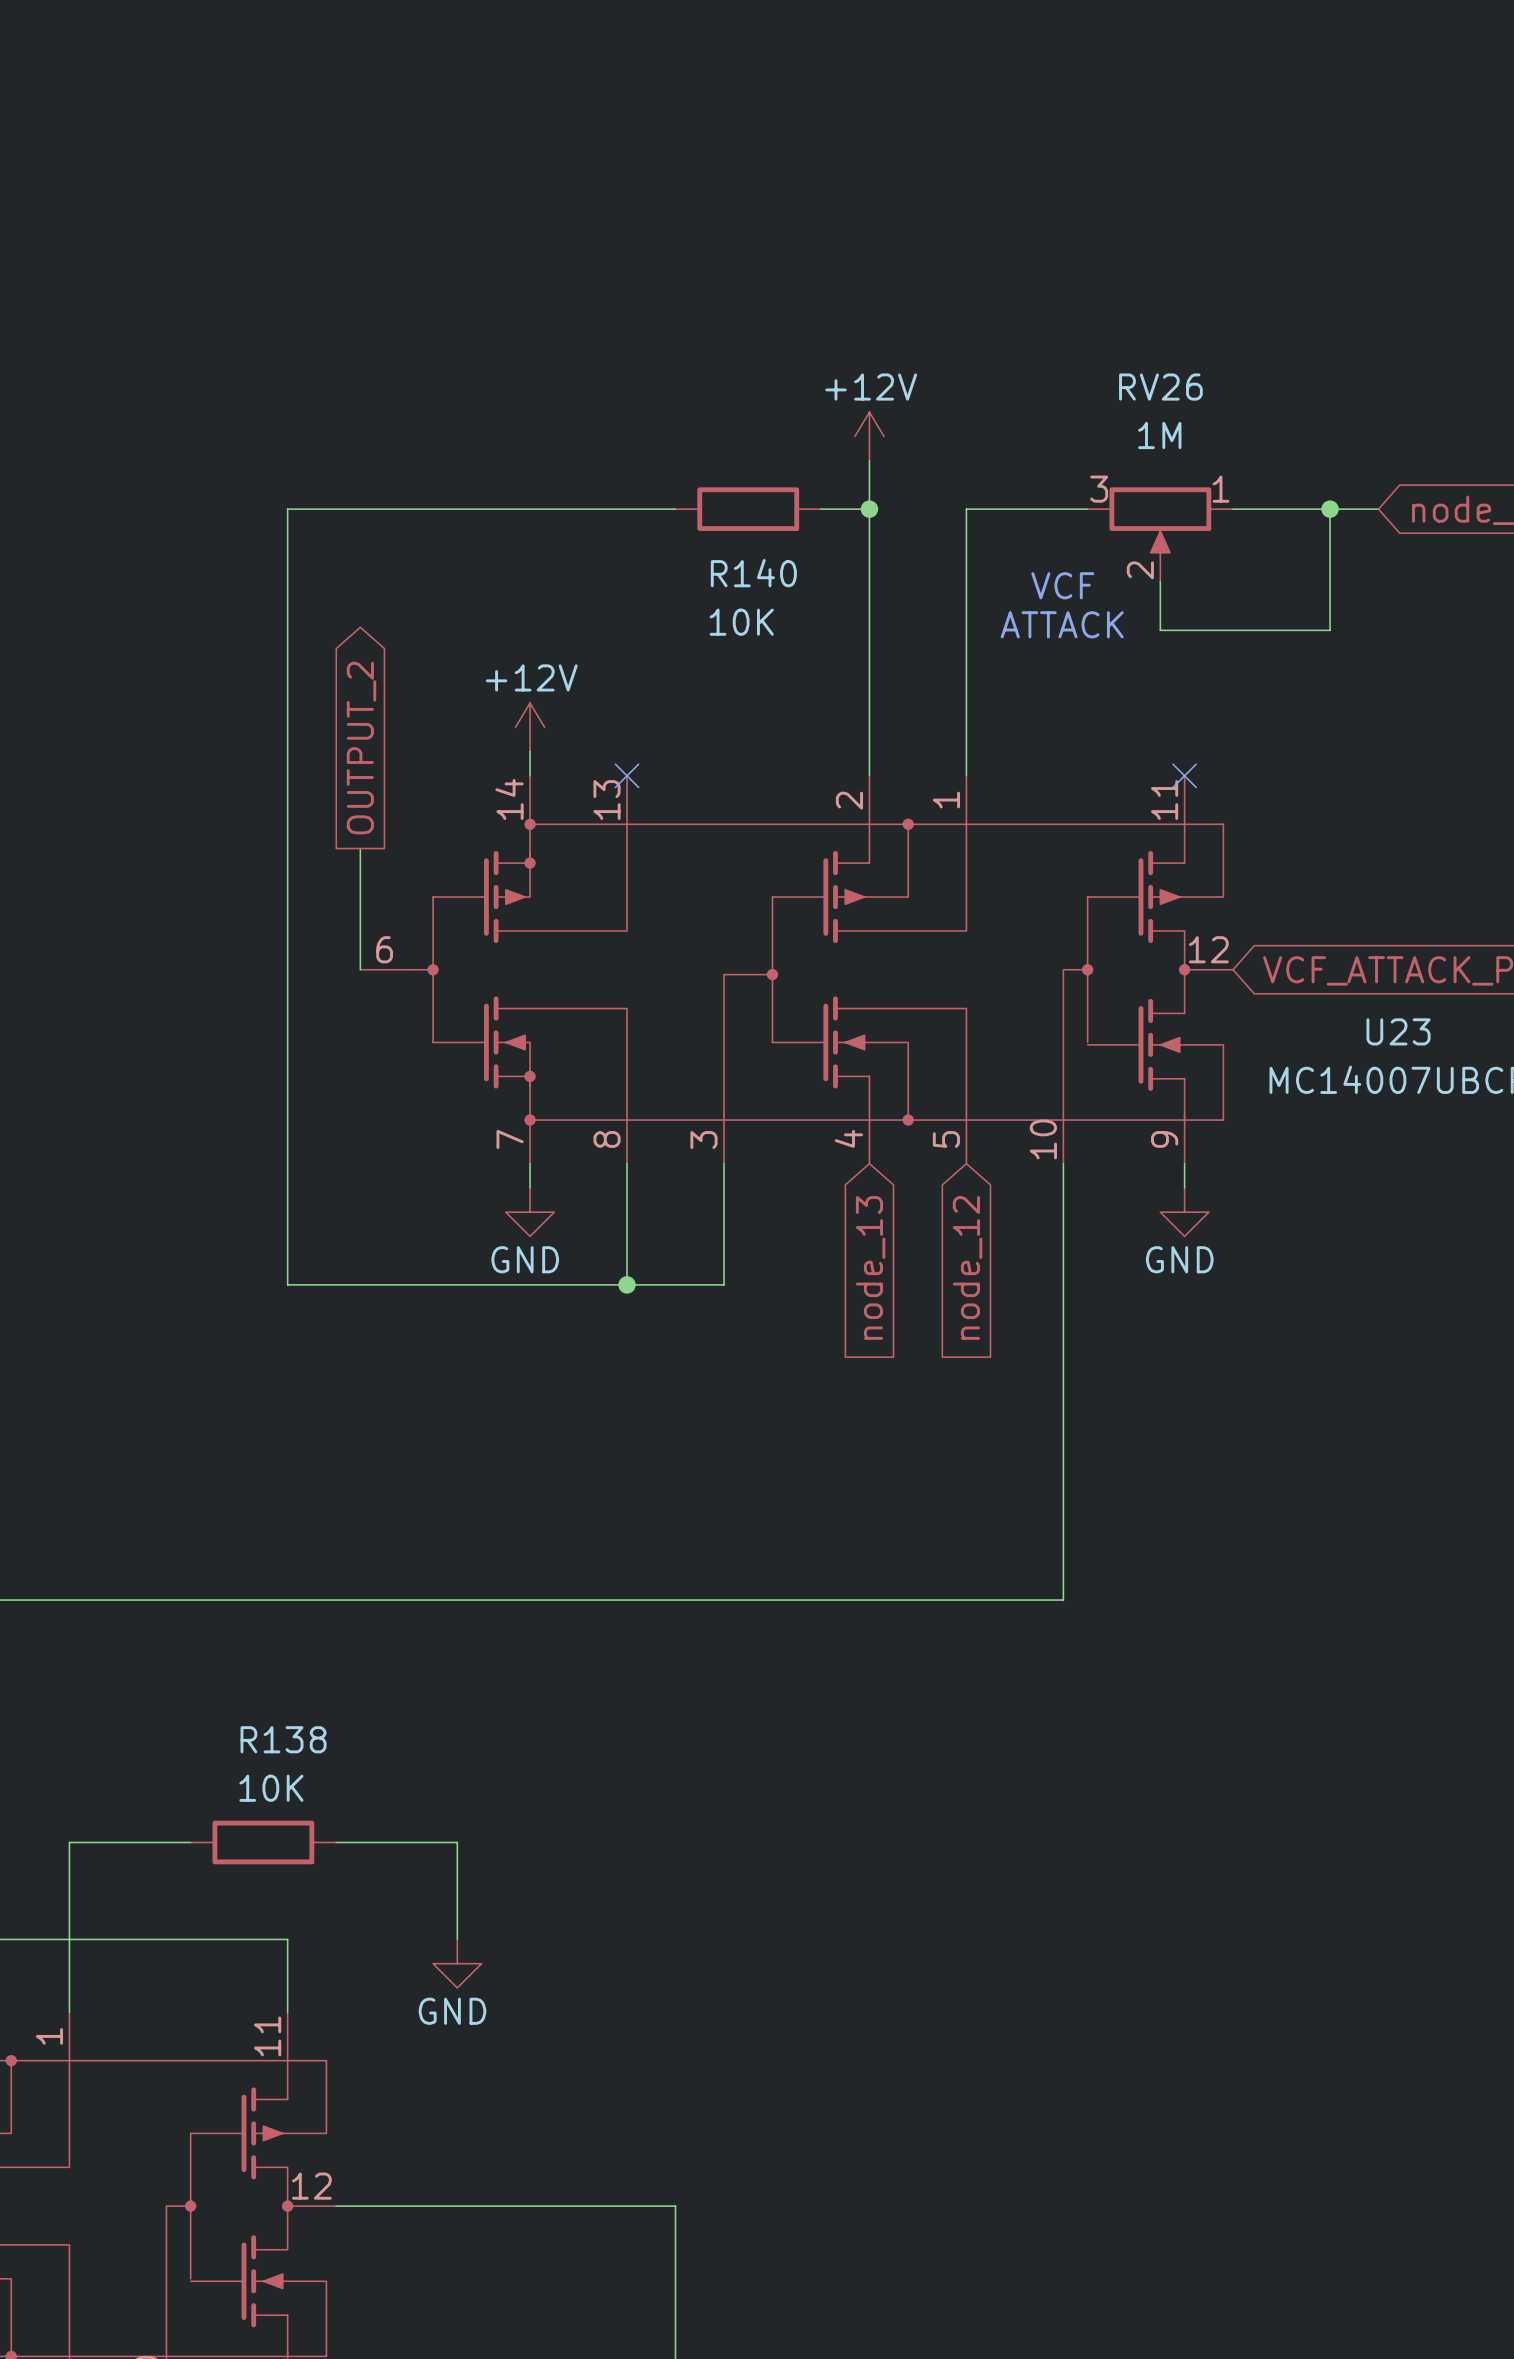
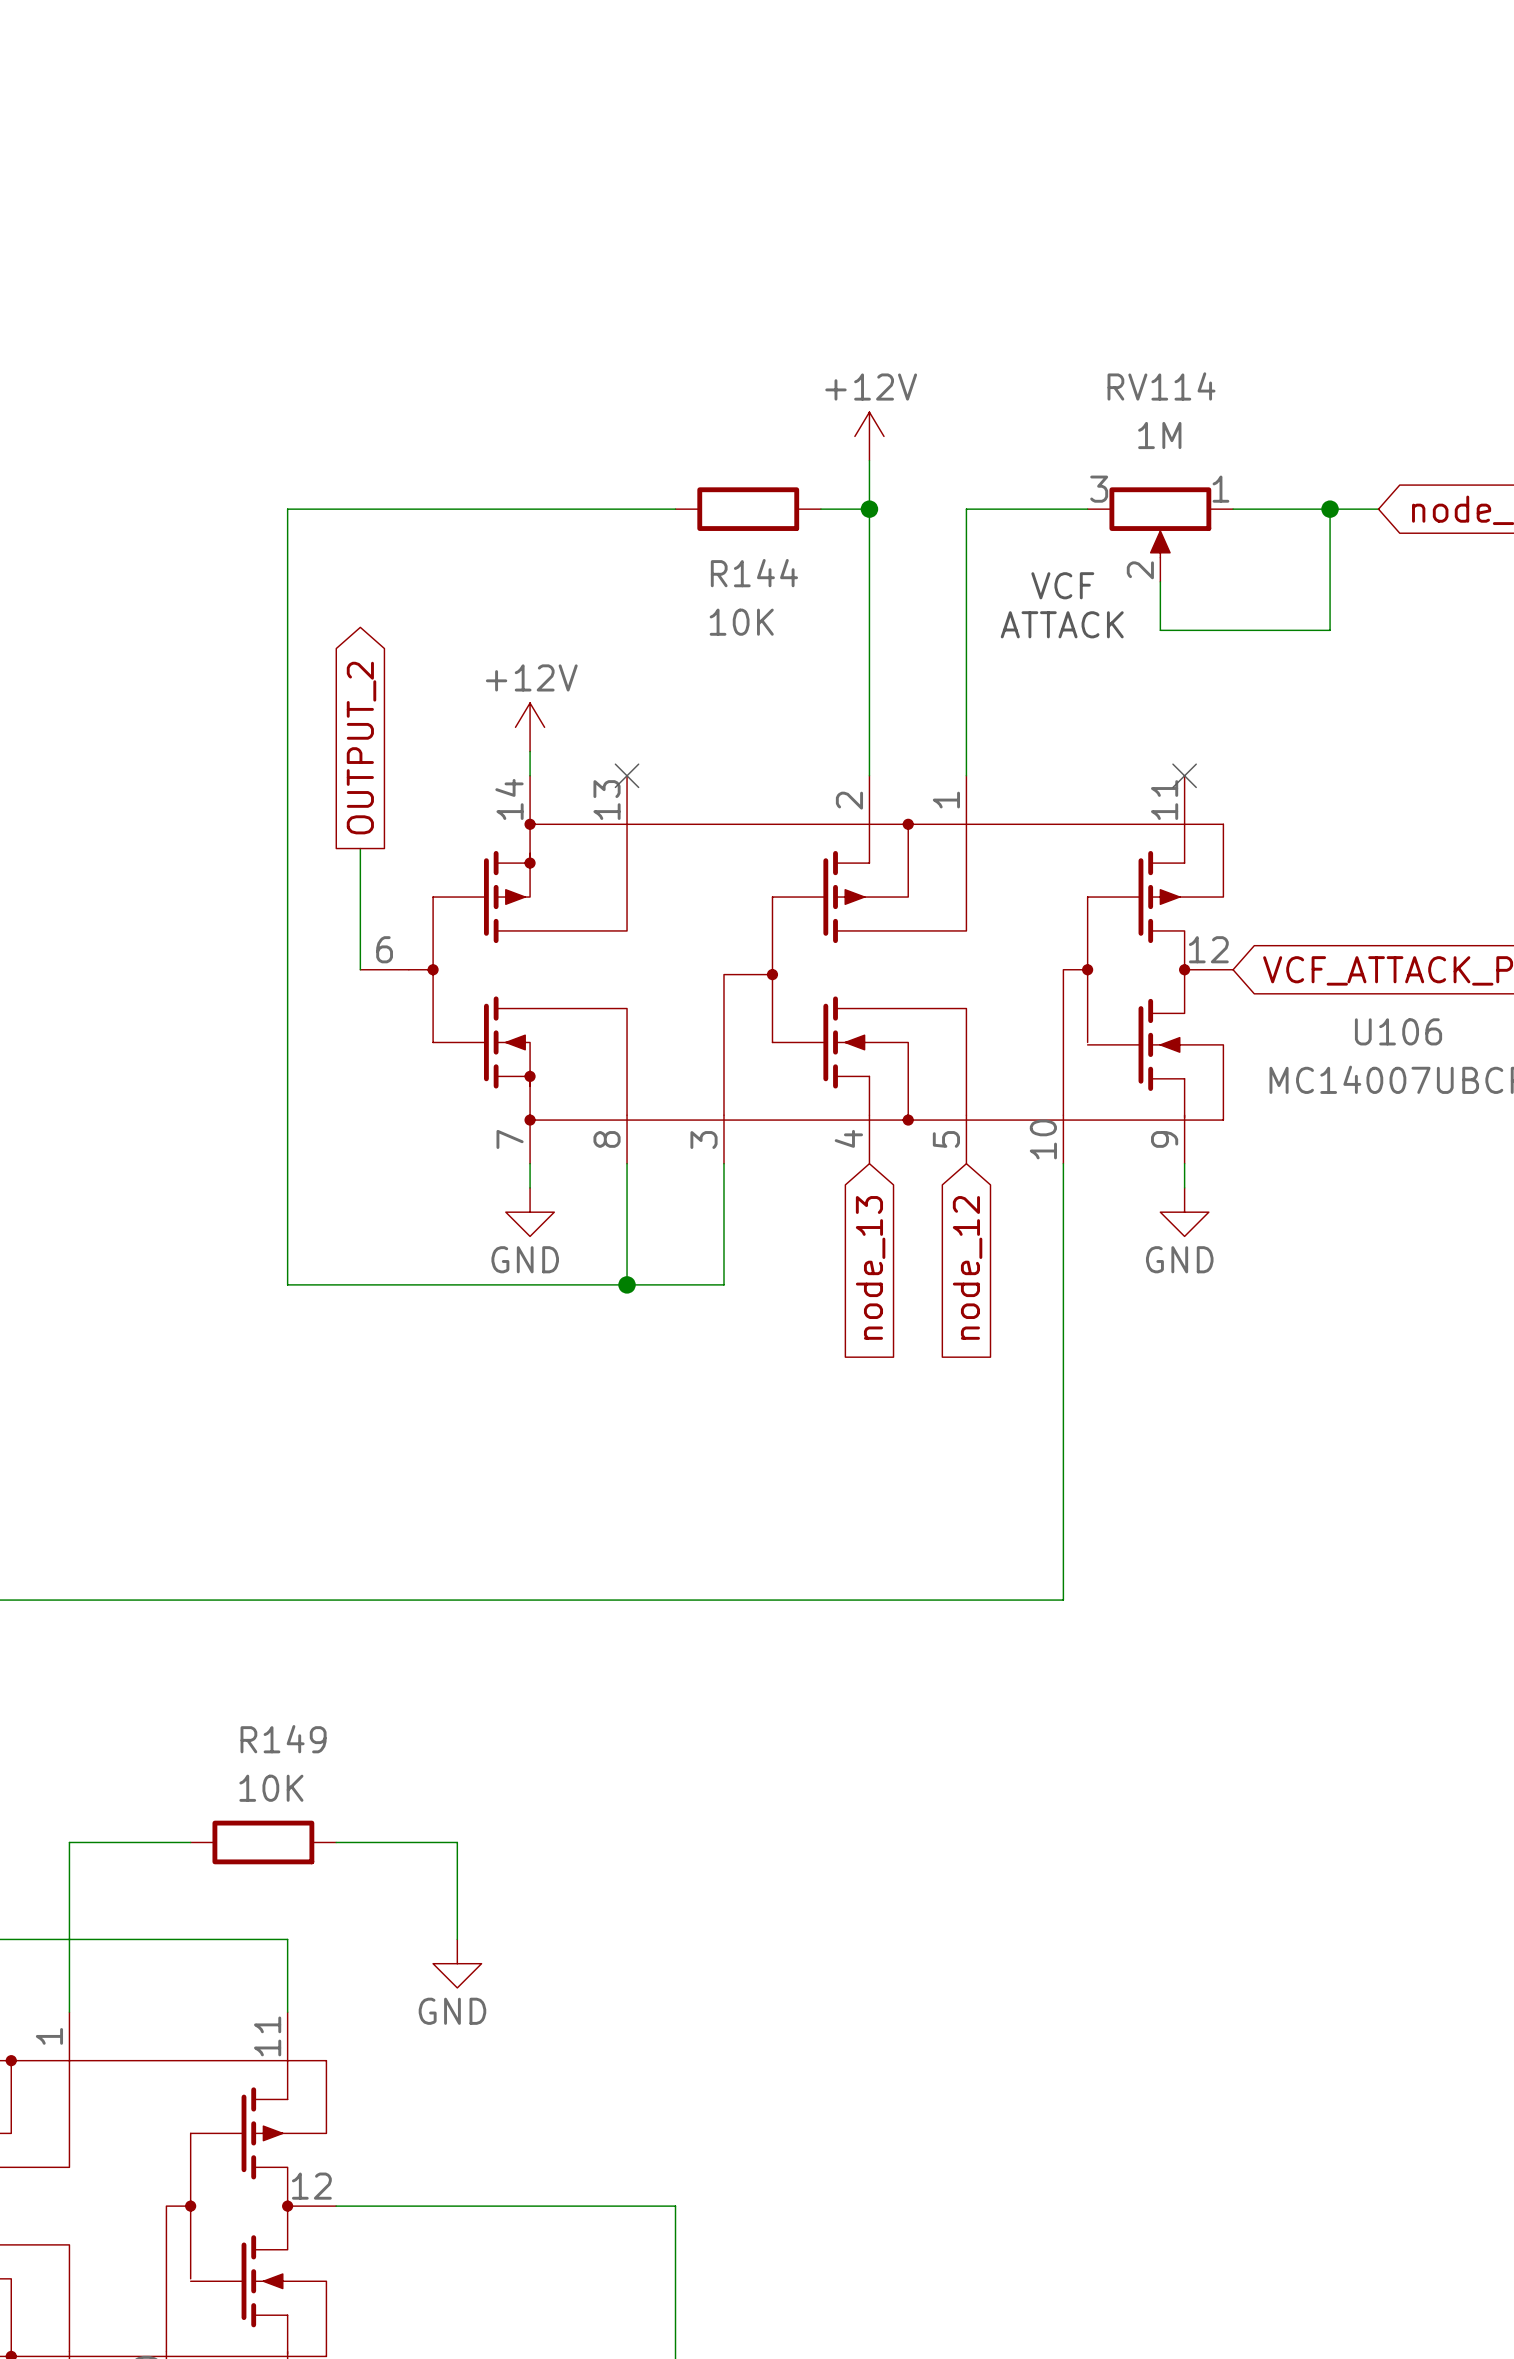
RV26 name: RV26 (1160, 387) -> RV114 (1161, 386)
R140 name: R140 (753, 573) -> R144 (754, 573)
U23 name: U23 (1398, 1031) -> U106 (1398, 1031)
R138 name: R138 (283, 1739) -> R149 (283, 1739)

